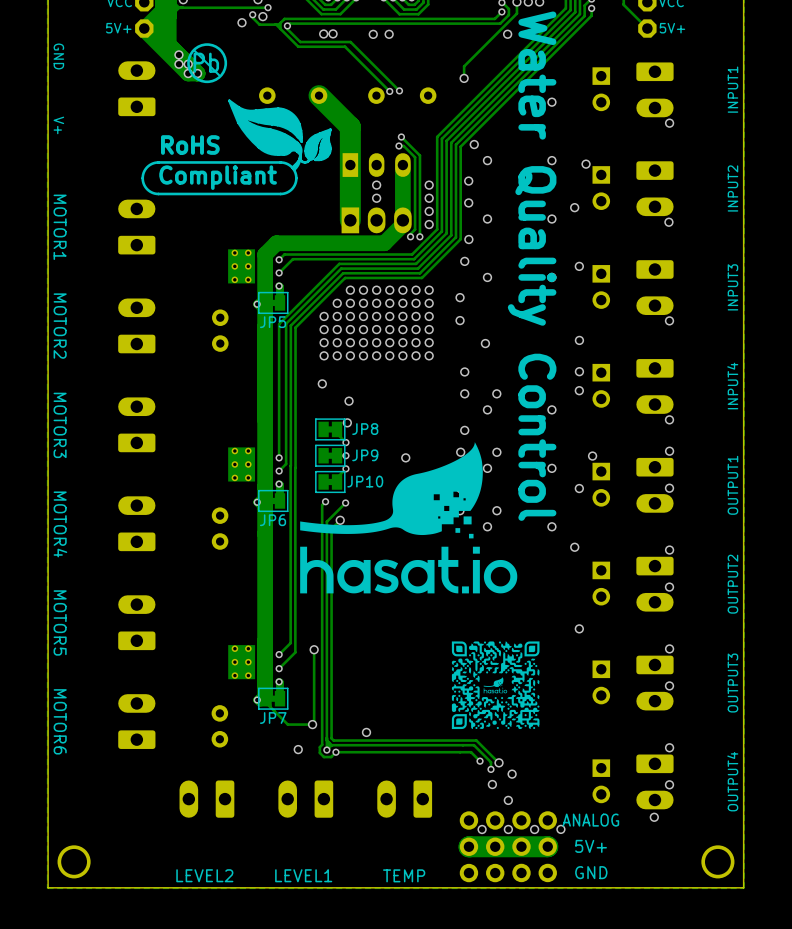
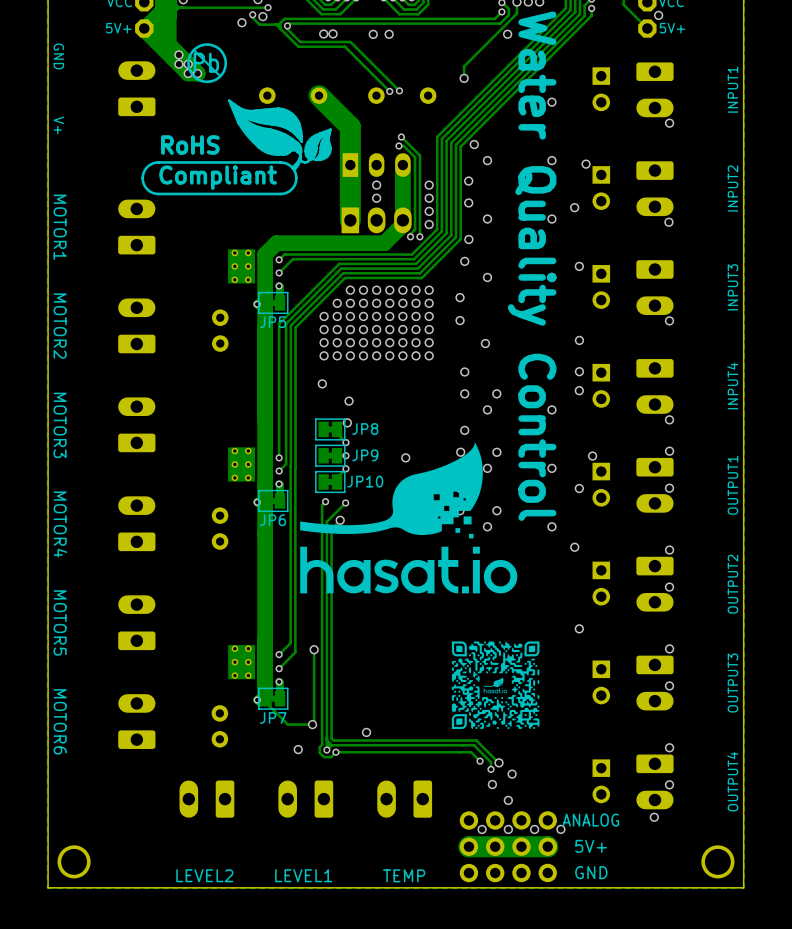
via: none -> (658, 15)

